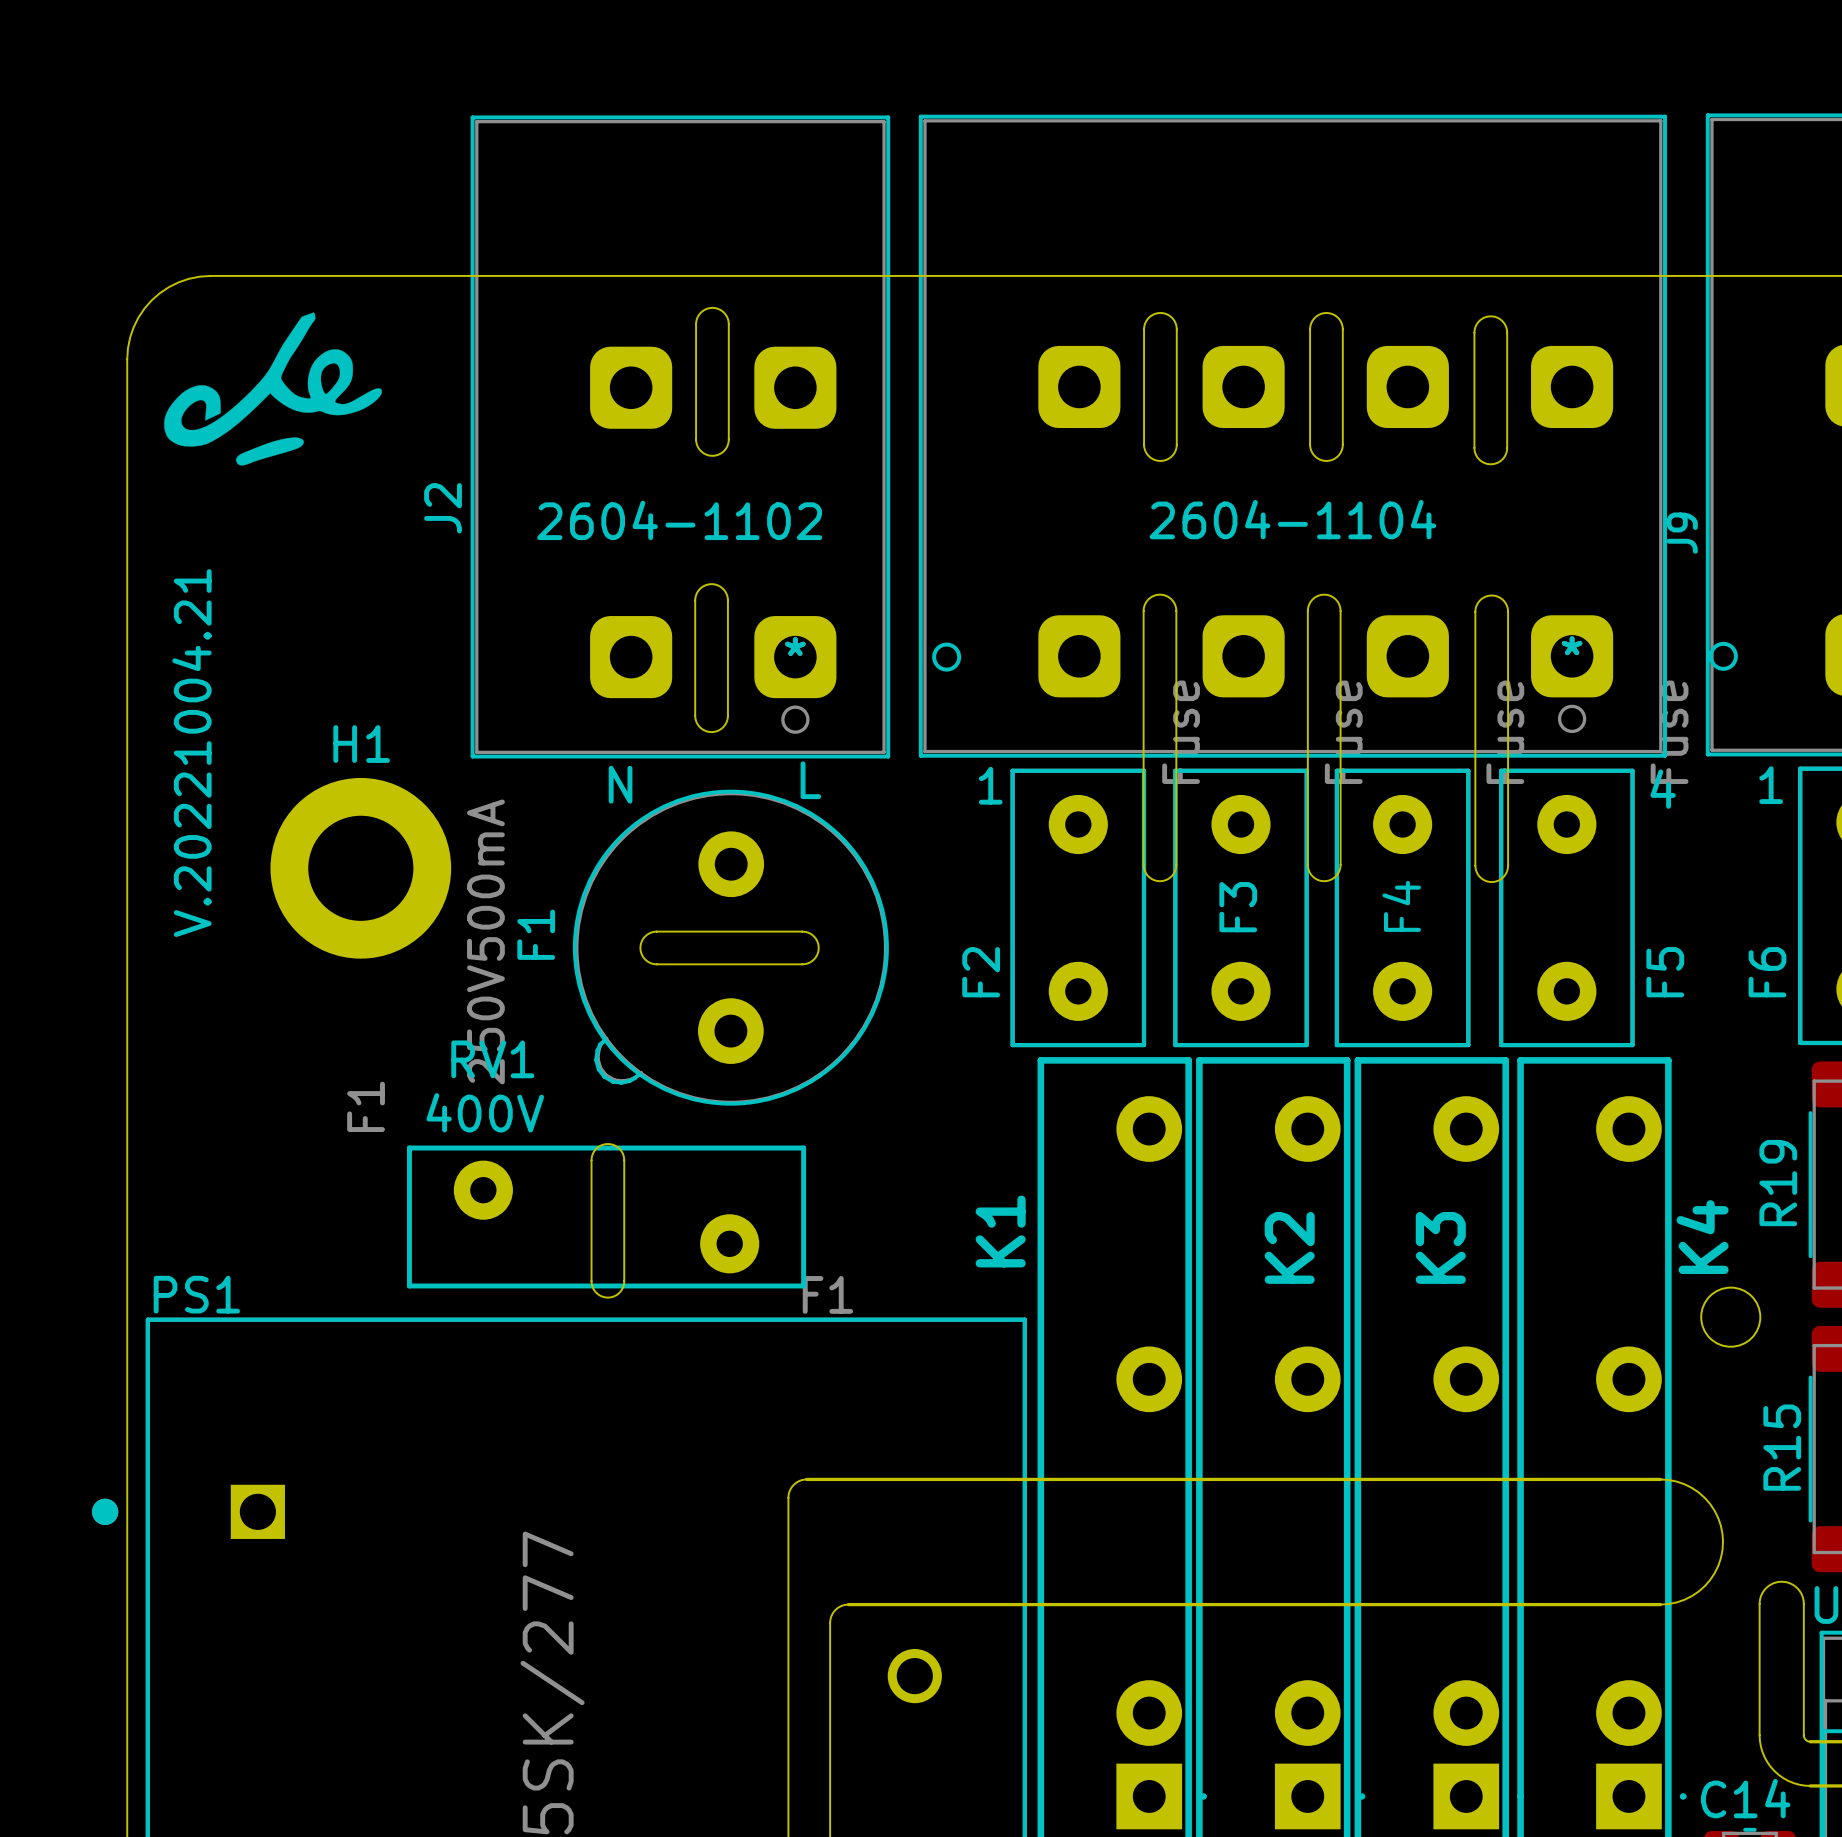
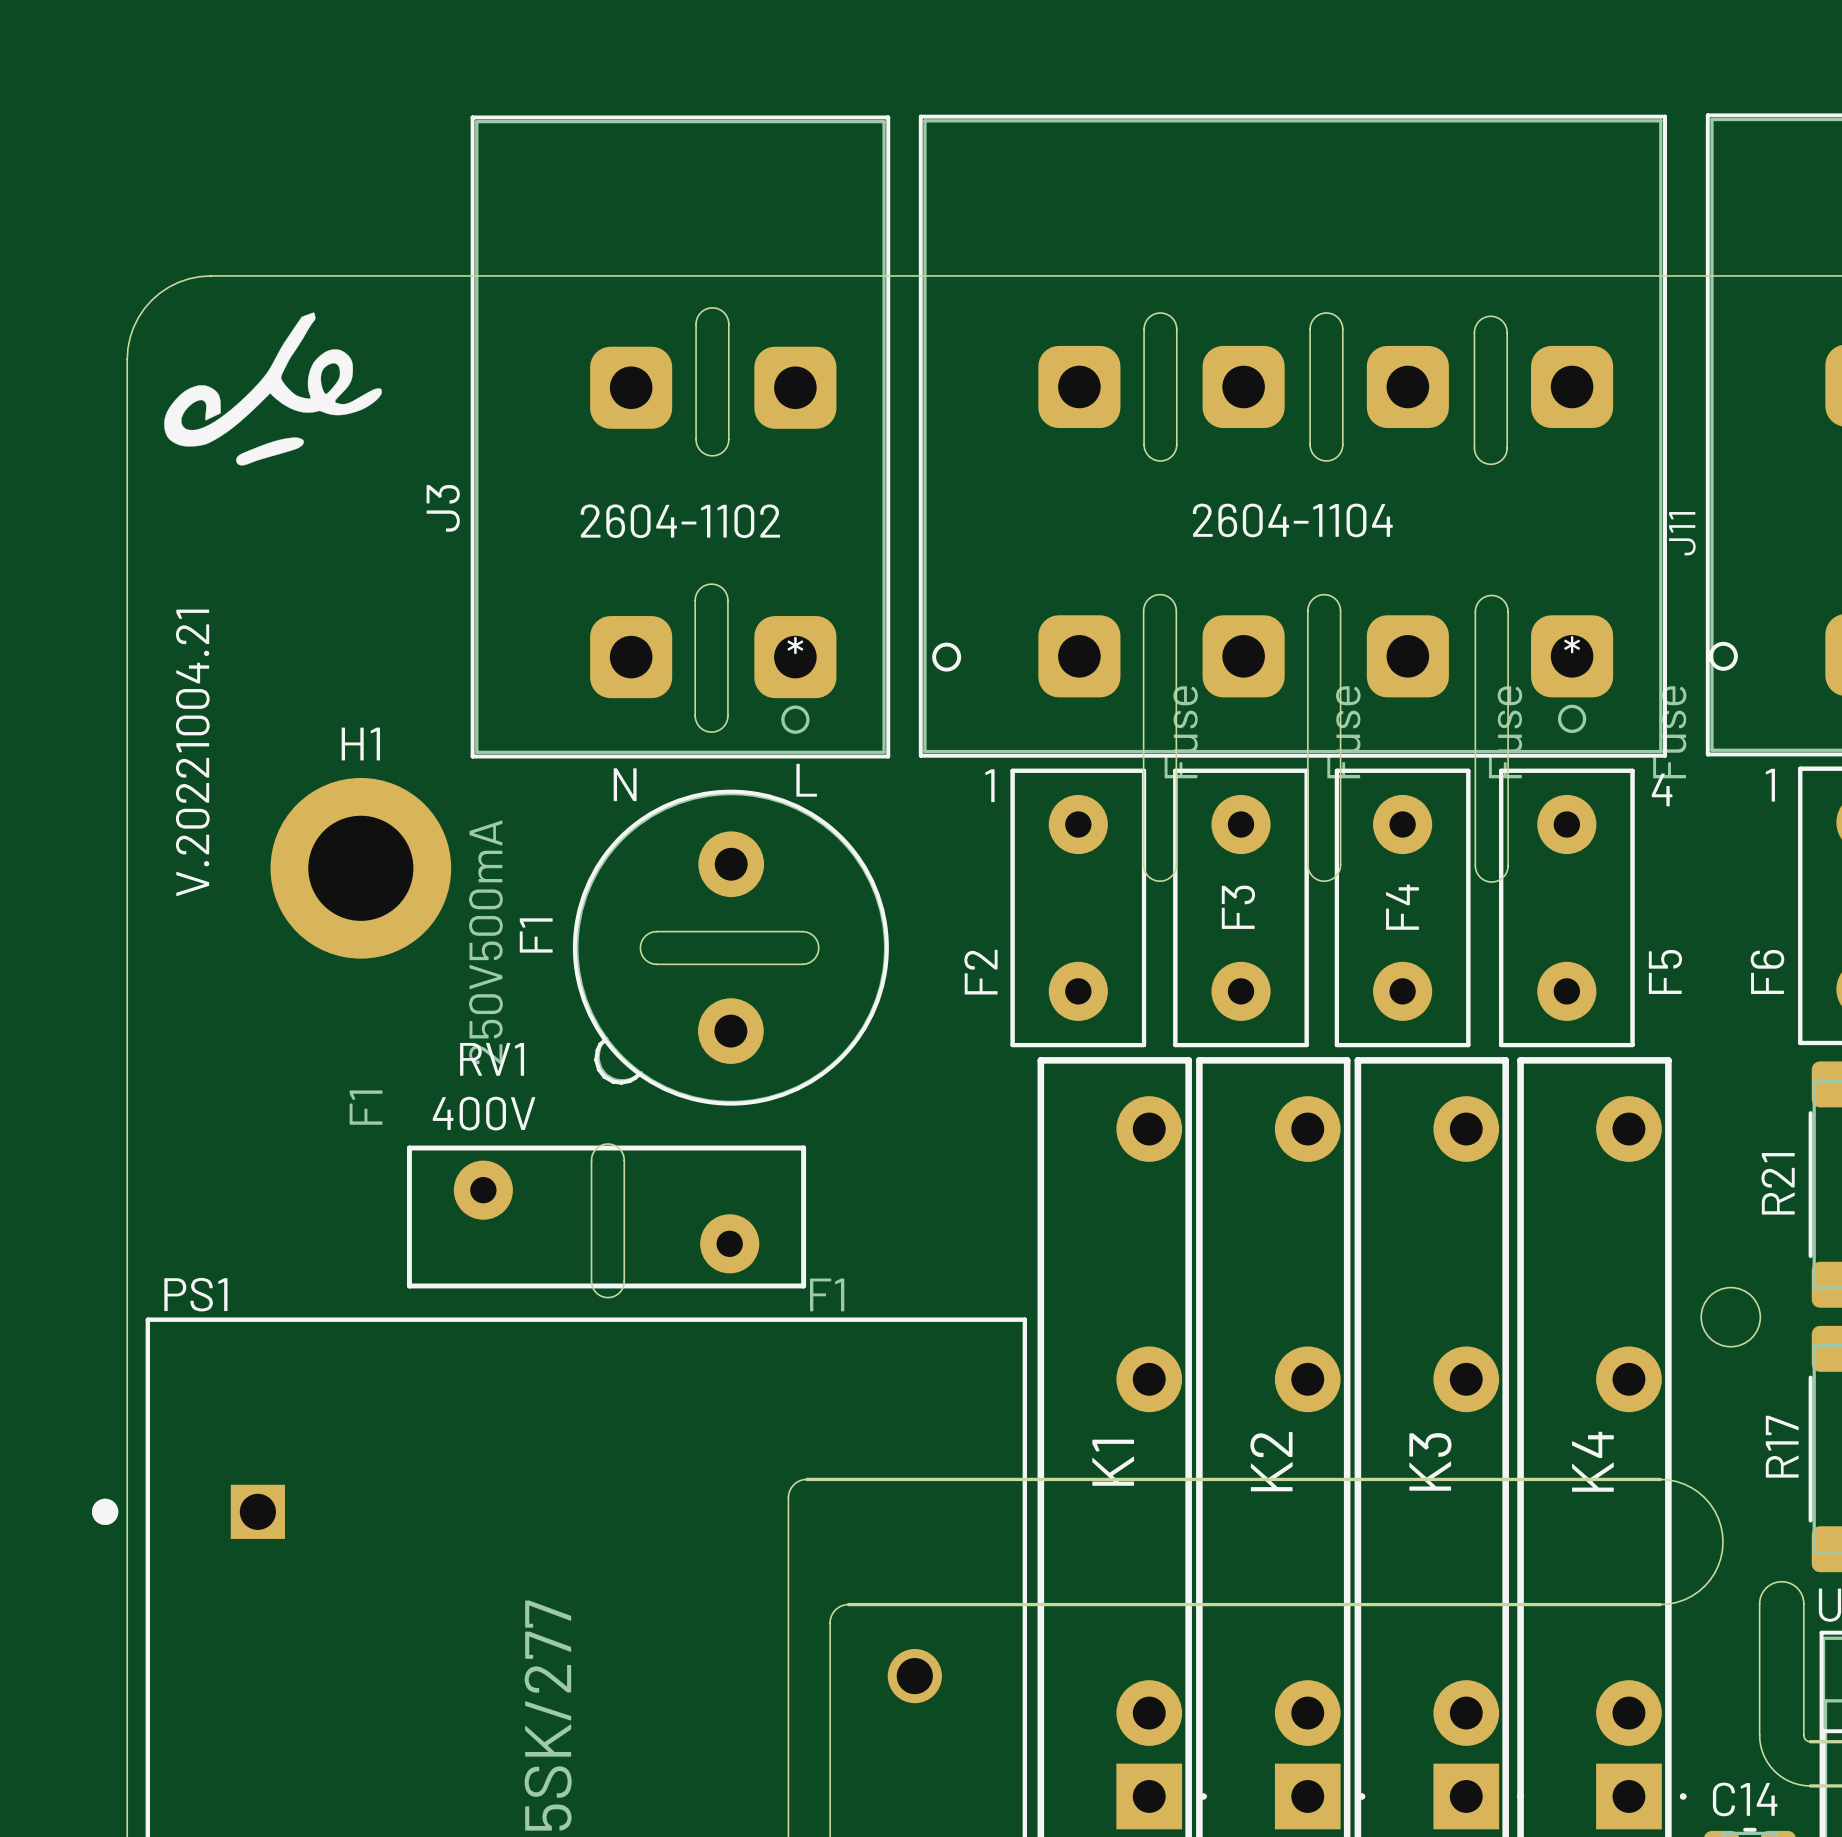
J2 name: J2 (443, 508) -> J3 (443, 508)
J9 name: J9 (1682, 533) -> J11 (1682, 533)
R19 name: R19 (1778, 1183) -> R21 (1778, 1183)
K1 name position: K1 (1000, 1231) -> K1 (1113, 1462)
K4 name position: K4 (1702, 1237) -> K4 (1592, 1461)
K2 name position: K2 (1289, 1247) -> K2 (1271, 1461)
K3 name position: K3 (1440, 1247) -> K3 (1430, 1461)
R15 name: R15 (1782, 1447) -> R17 (1782, 1446)

